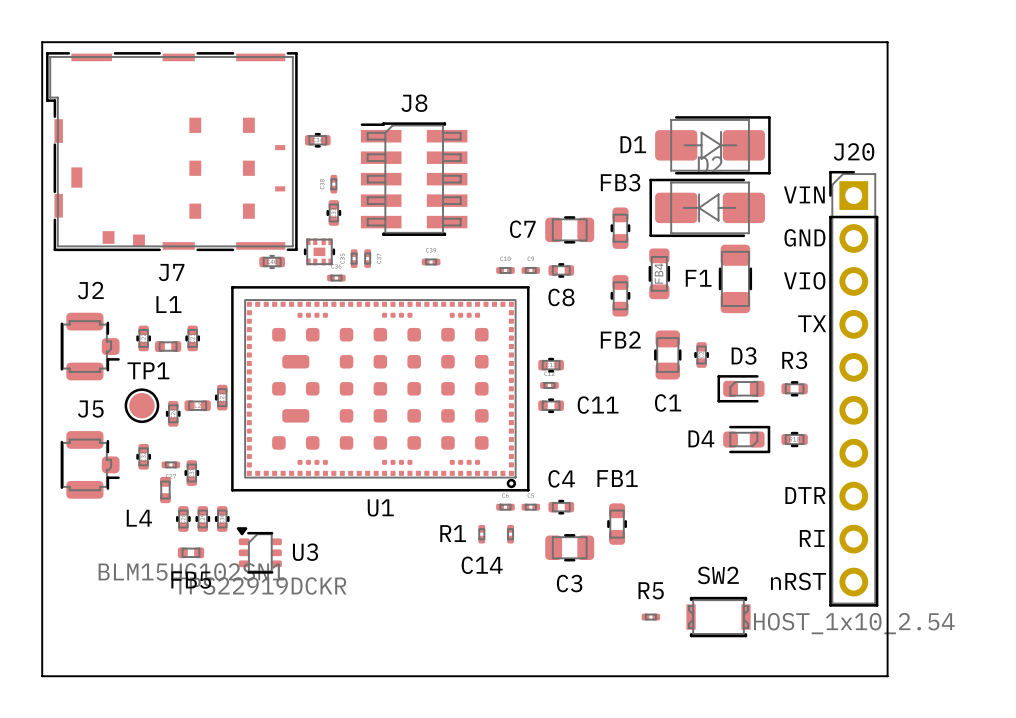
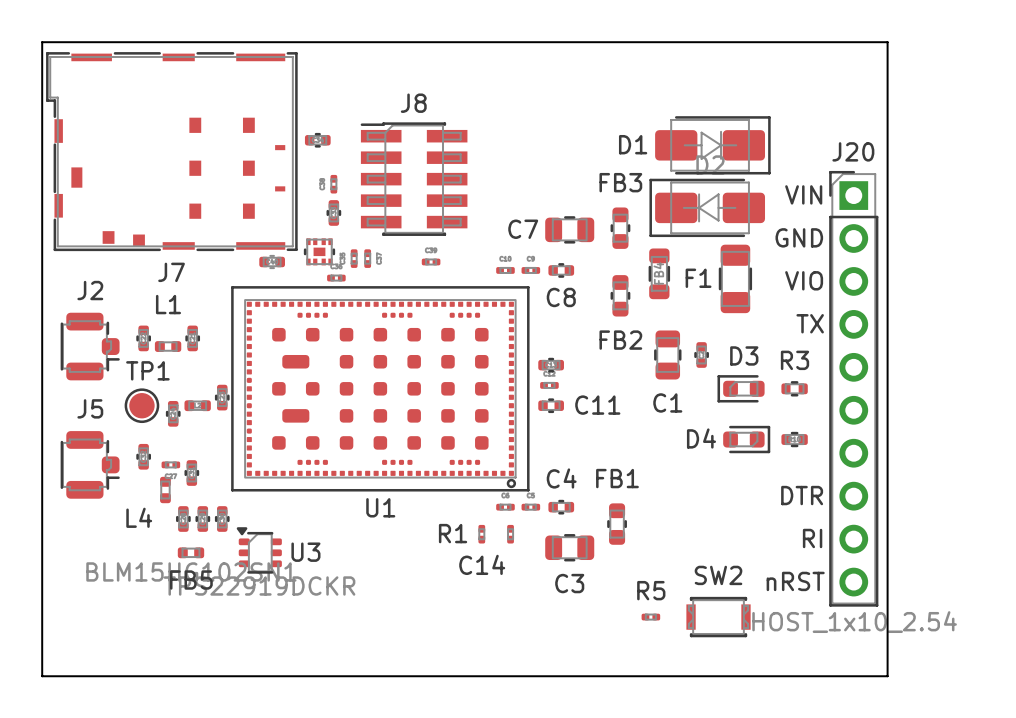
part footprint: [214, 384, 228, 411] -> [214, 384, 230, 411]

